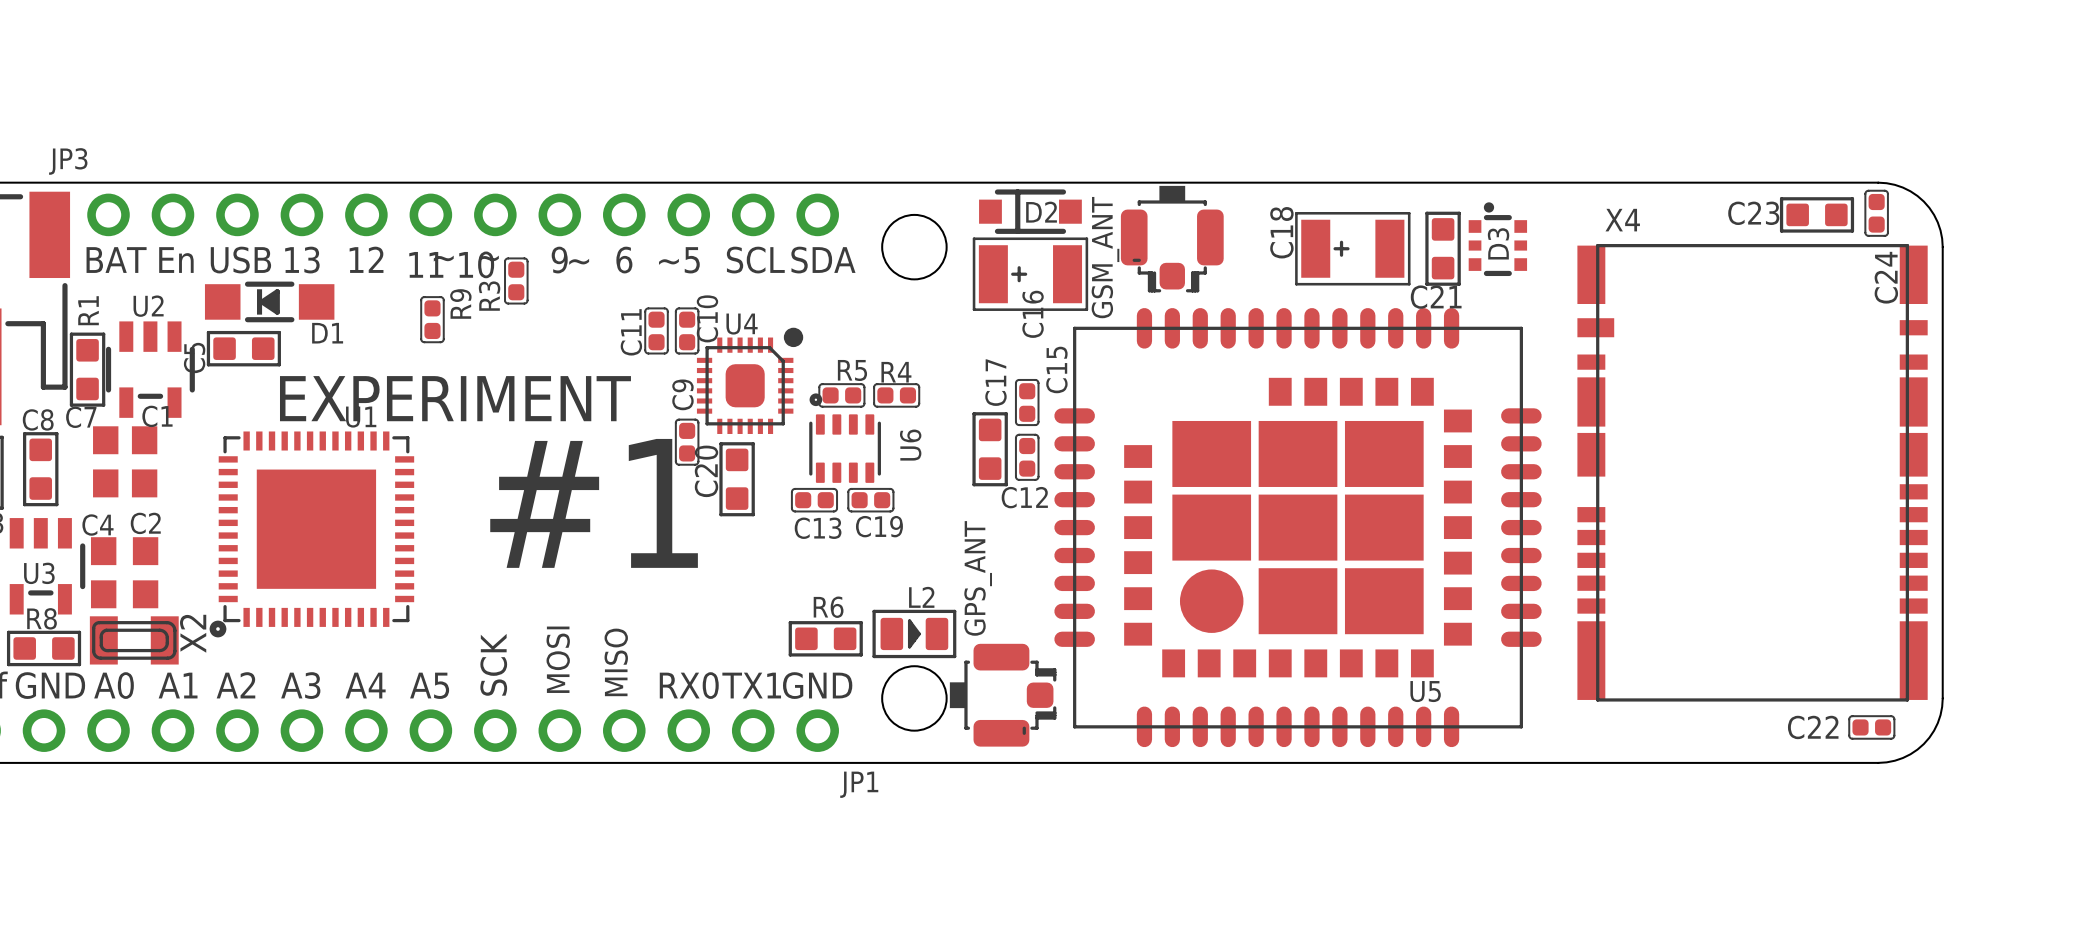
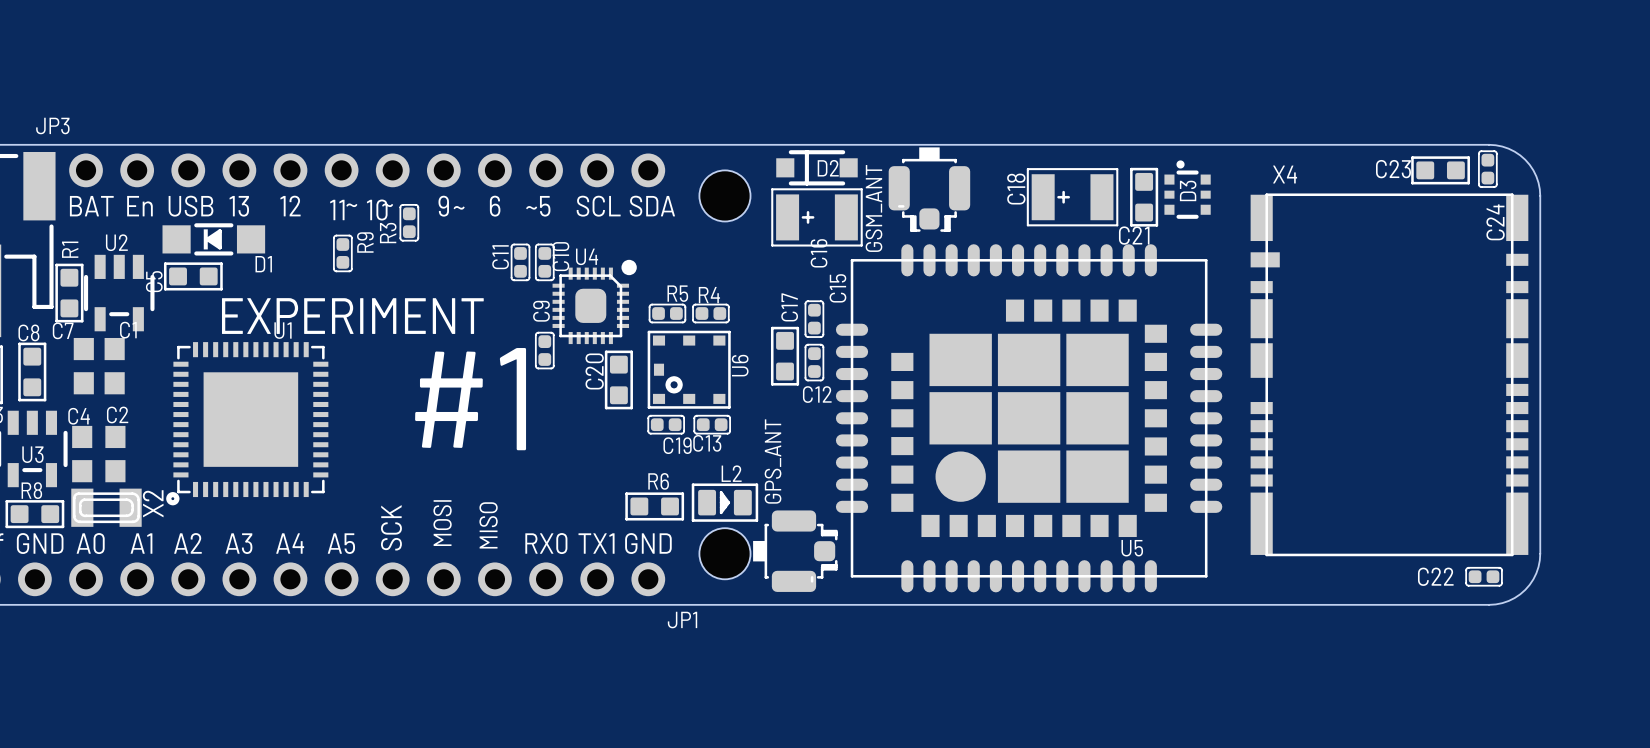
U6 footprint: [809, 393, 881, 483] -> [647, 330, 731, 409]
C20 position: (737, 479) -> (618, 379)
C13 position: (814, 500) -> (712, 424)
C19 position: (870, 500) -> (666, 424)
C13 name position: C13 (818, 528) -> C13 (707, 443)

